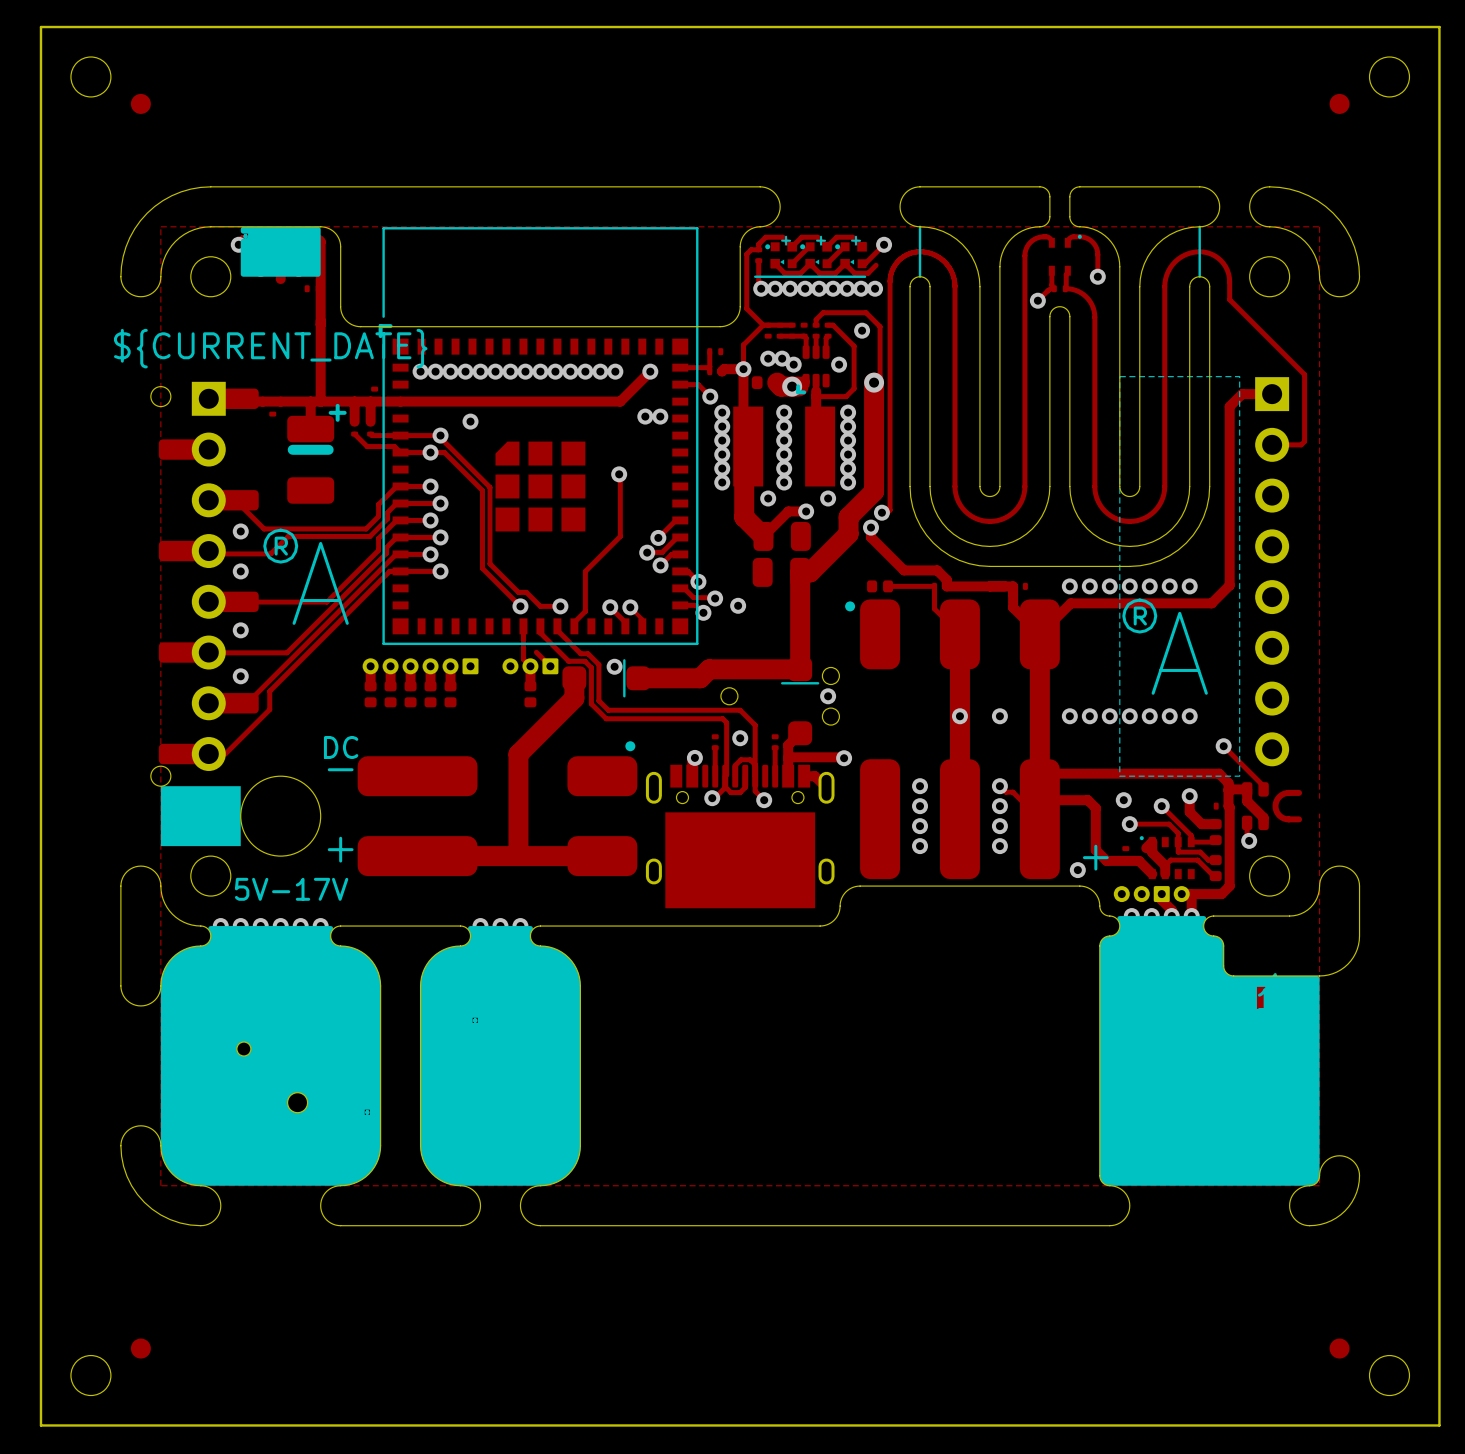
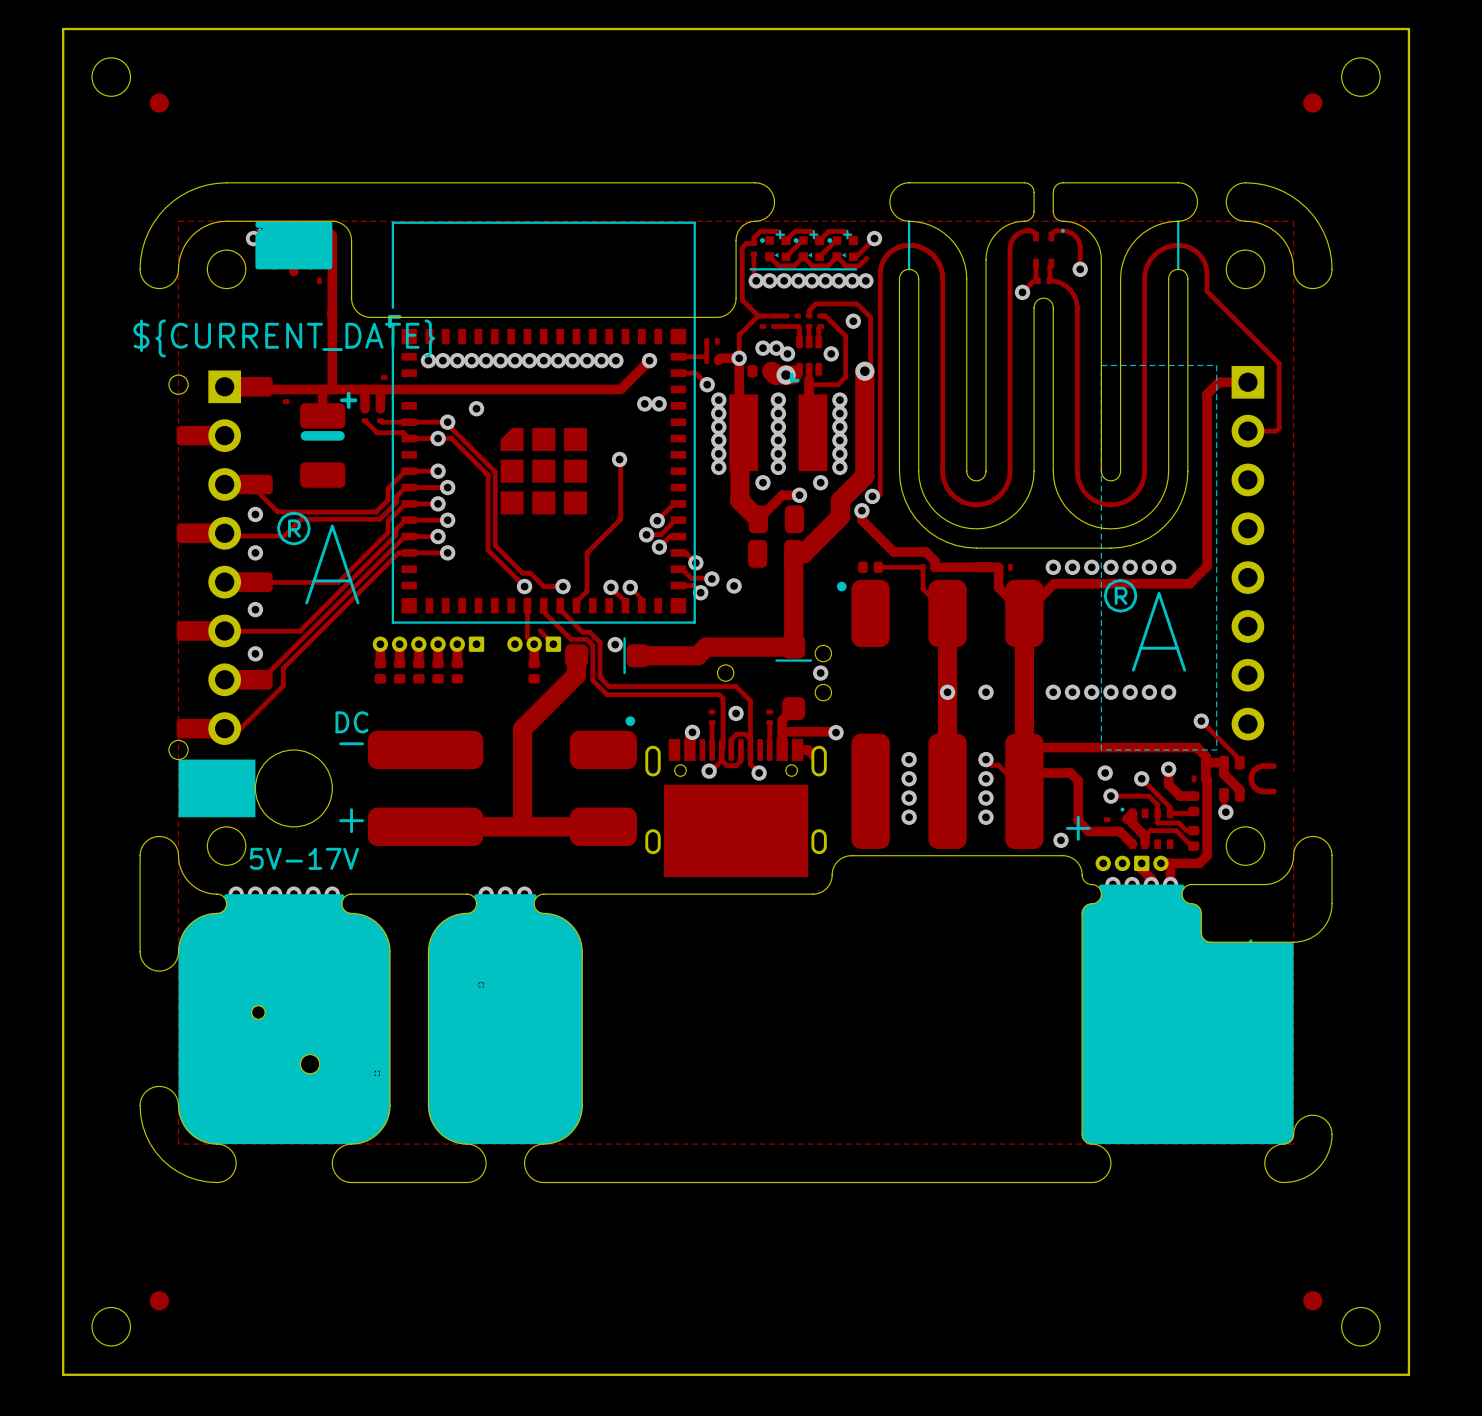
drawing shape: [1099, 916, 1320, 1186] -> [1082, 884, 1294, 1145]

